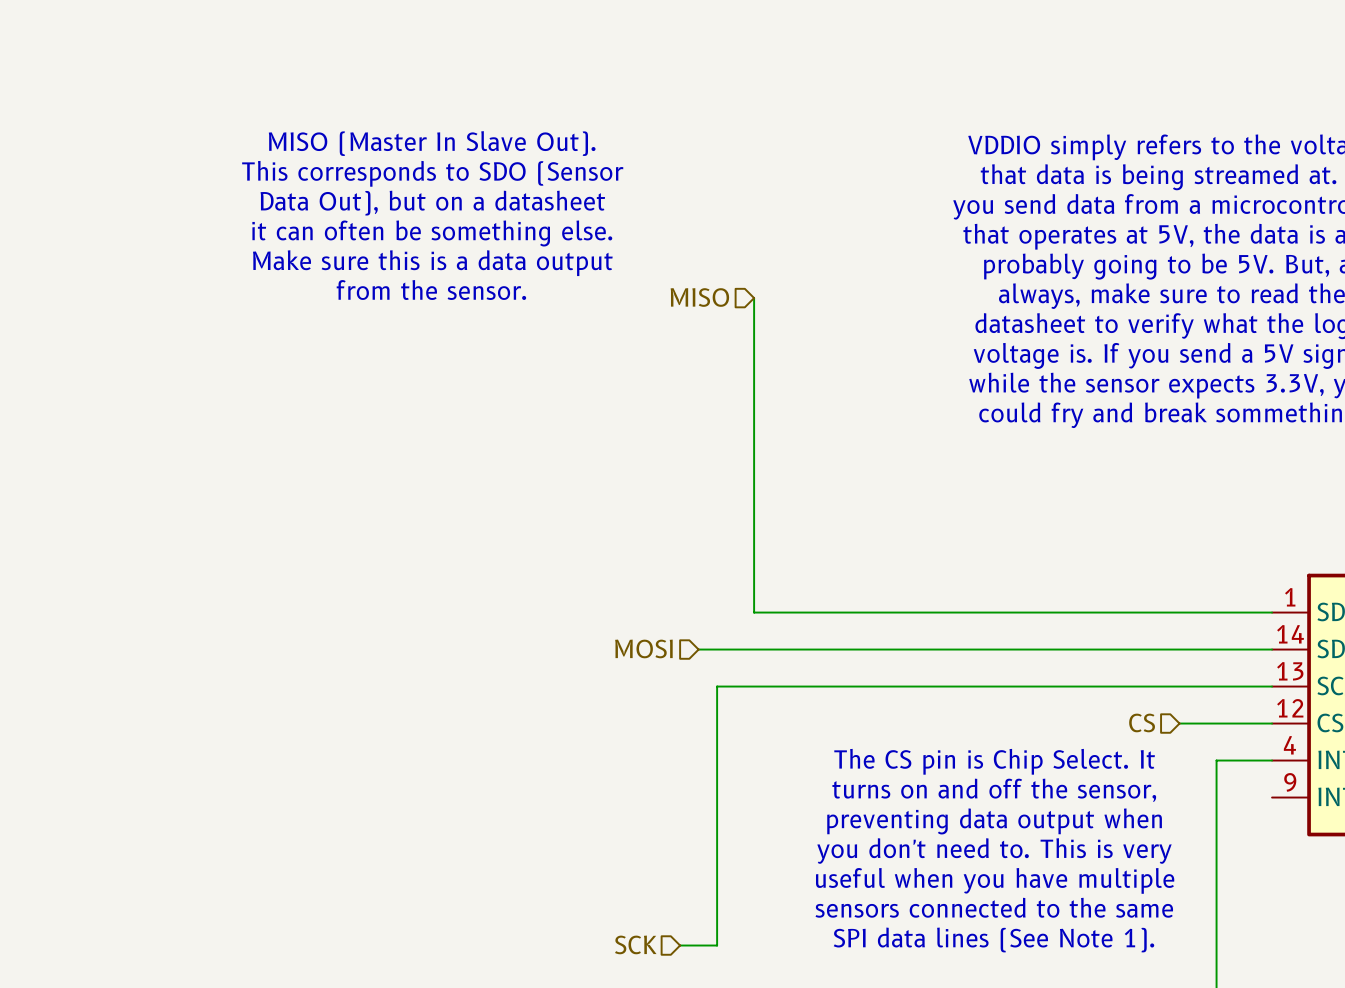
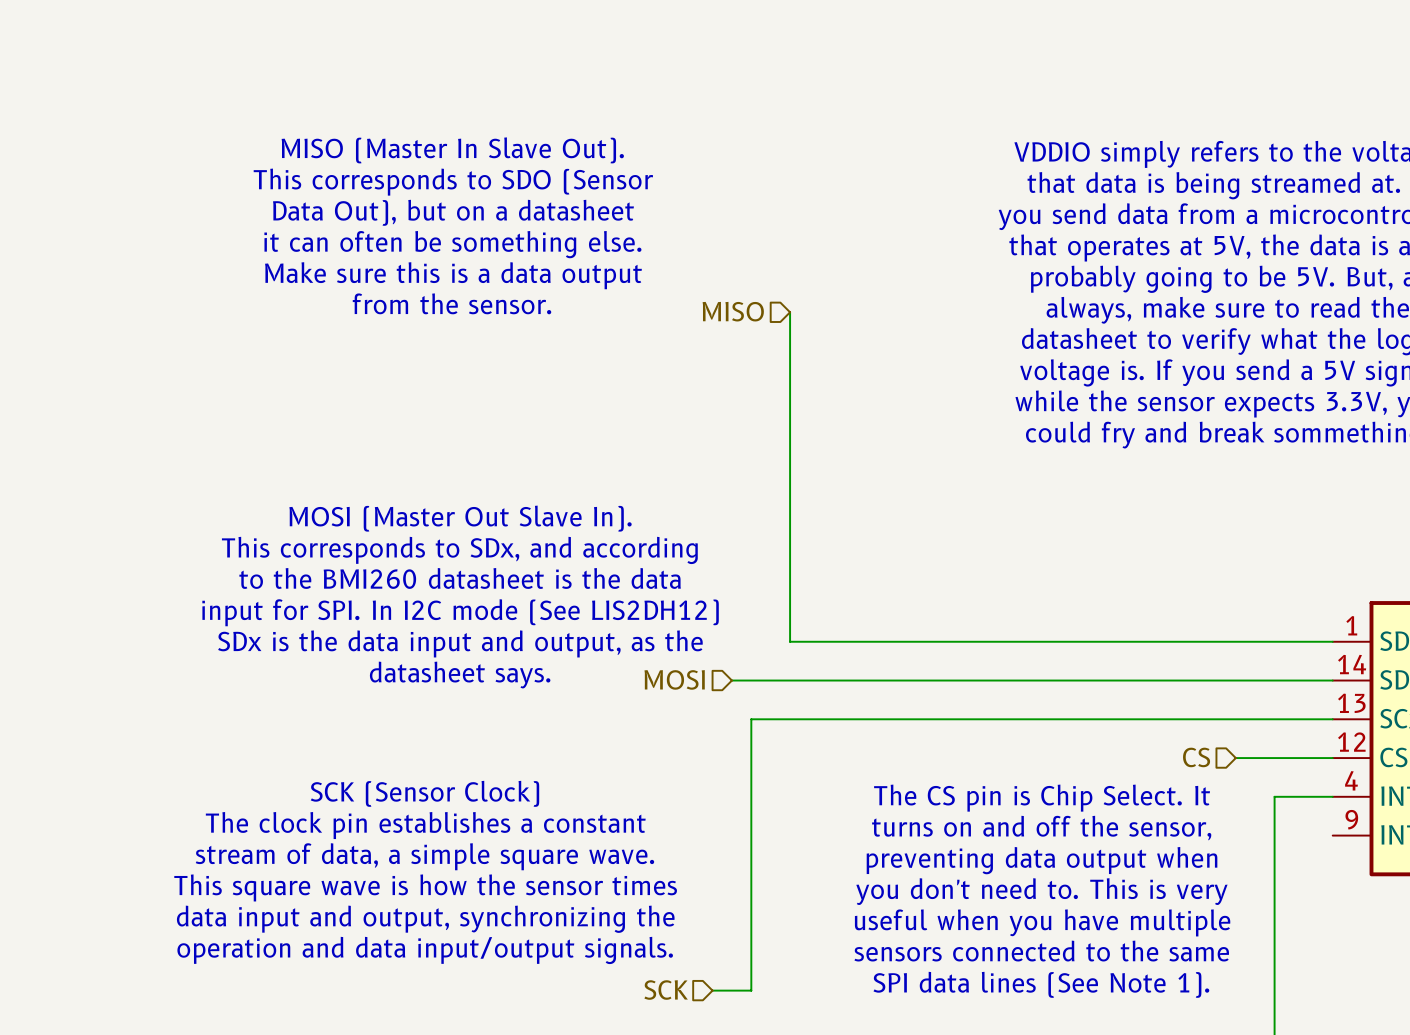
text: none -> MOSI (Master Out Slave In). (460, 518)
text: none -> This corresponds to SDx, and according (459, 550)
text: none -> to the BMI260 datasheet is the data (460, 578)
text: none -> input for SPI. In I2C mode (See LIS2DH12) (460, 612)
text: none -> SDx is the data input and output, as the (460, 643)
text: none -> datasheet says. (460, 675)
text: none -> SCK (Sensor Clock) (424, 793)
text: none -> The clock pin establishes a constant (425, 825)
text: none -> stream of data, a simple square wave. (424, 856)
text: none -> This square wave is how the sensor times (425, 887)
text: none -> data input and output, synchronizing the (425, 919)
text: none -> operation and data input/output signals. (425, 950)

